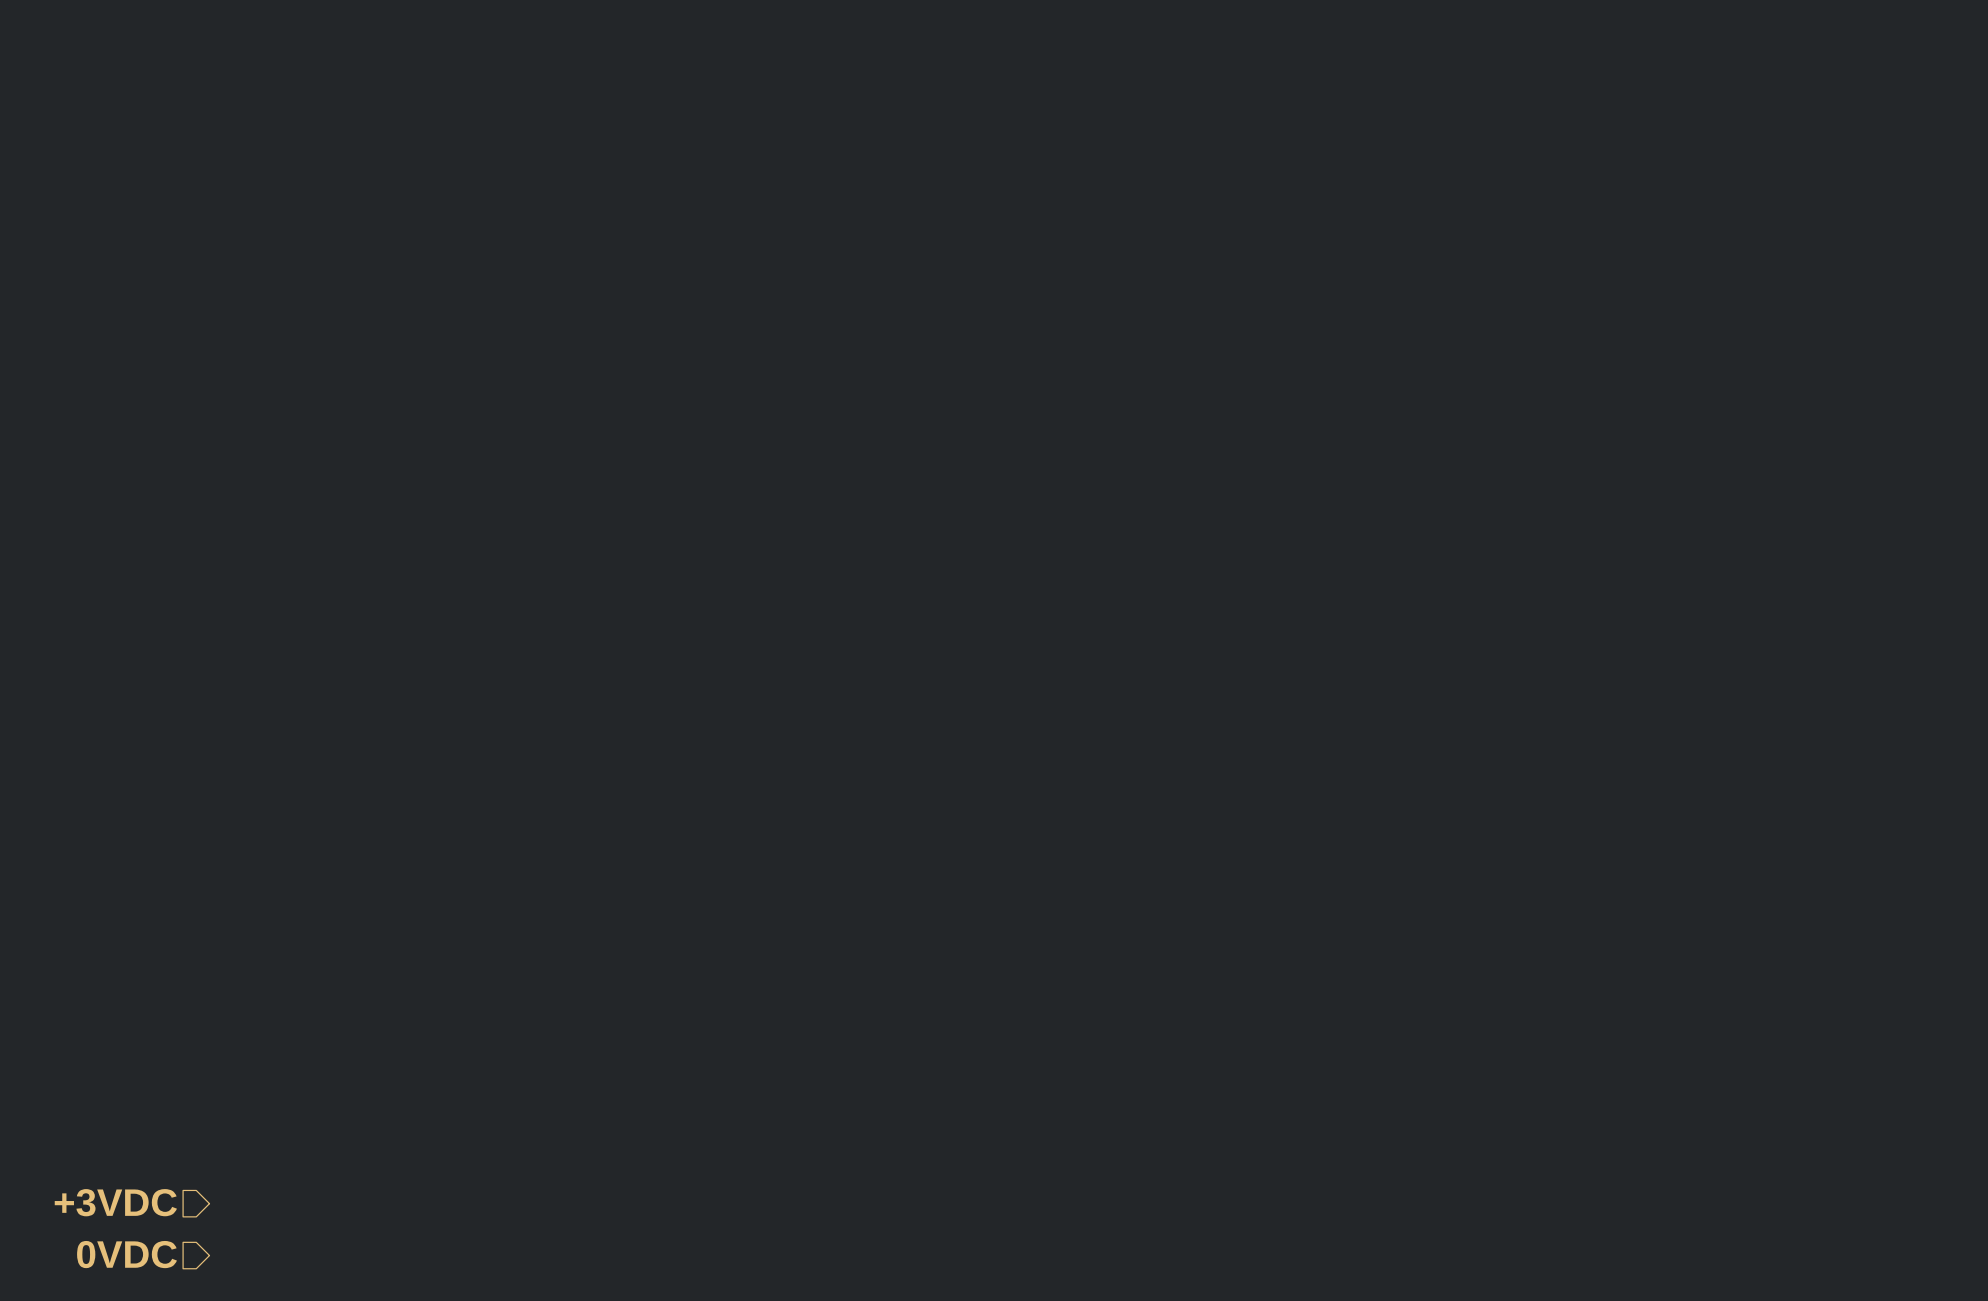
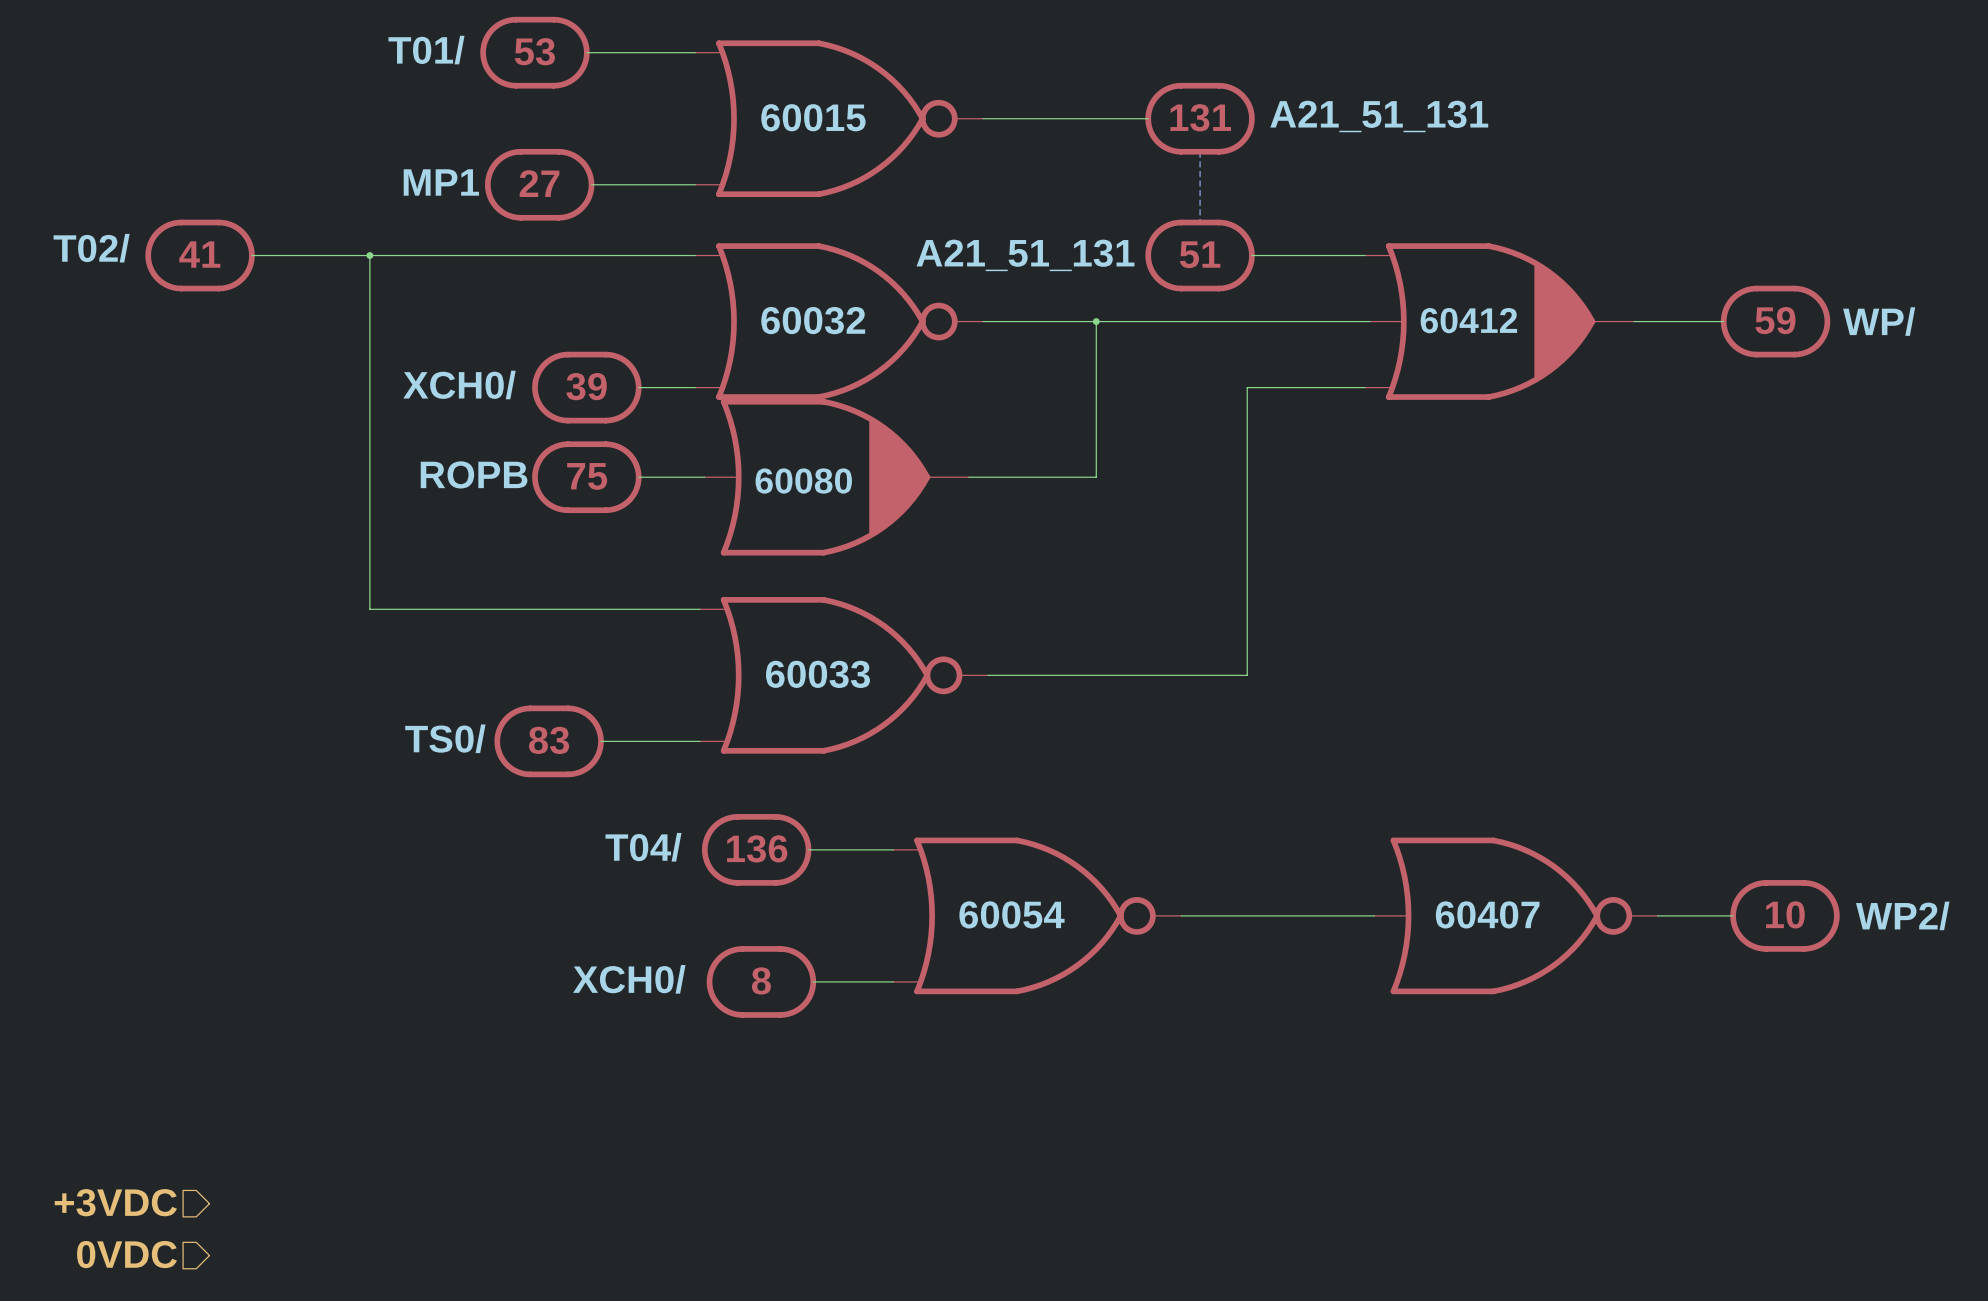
part: none -> (534, 52)
wire: none -> (586, 52) (695, 52)
part: none -> (839, 118)
wire: none -> (983, 118) (1148, 118)
part: none -> (1200, 118)
line: none -> (1200, 151) (1200, 222)
part: none -> (539, 184)
wire: none -> (591, 184) (695, 184)
part: none -> (200, 255)
wire: none -> (251, 255) (695, 255)
wire: none -> (369, 255) (369, 609) (700, 609)
junction: none -> (369, 255)
part: none -> (1200, 255)
wire: none -> (1251, 255) (1365, 255)
part: none -> (839, 321)
wire: none -> (983, 321) (1369, 321)
wire: none -> (1096, 321) (1096, 477) (968, 477)
junction: none -> (1096, 321)
part: none -> (1499, 321)
wire: none -> (1634, 321) (1723, 321)
part: none -> (1775, 321)
part: none -> (586, 387)
wire: none -> (638, 387) (695, 387)
wire: none -> (1365, 387) (1247, 387) (1247, 675) (987, 675)
part: none -> (586, 477)
wire: none -> (638, 477) (704, 477)
part: none -> (836, 477)
part: none -> (843, 675)
part: none -> (549, 741)
wire: none -> (601, 741) (700, 741)
part: none -> (756, 849)
wire: none -> (808, 849) (893, 849)
part: none -> (1037, 915)
wire: none -> (1181, 915) (1374, 915)
part: none -> (1516, 915)
wire: none -> (1657, 915) (1733, 915)
part: none -> (1784, 915)
part: none -> (761, 981)
wire: none -> (813, 981) (893, 981)

